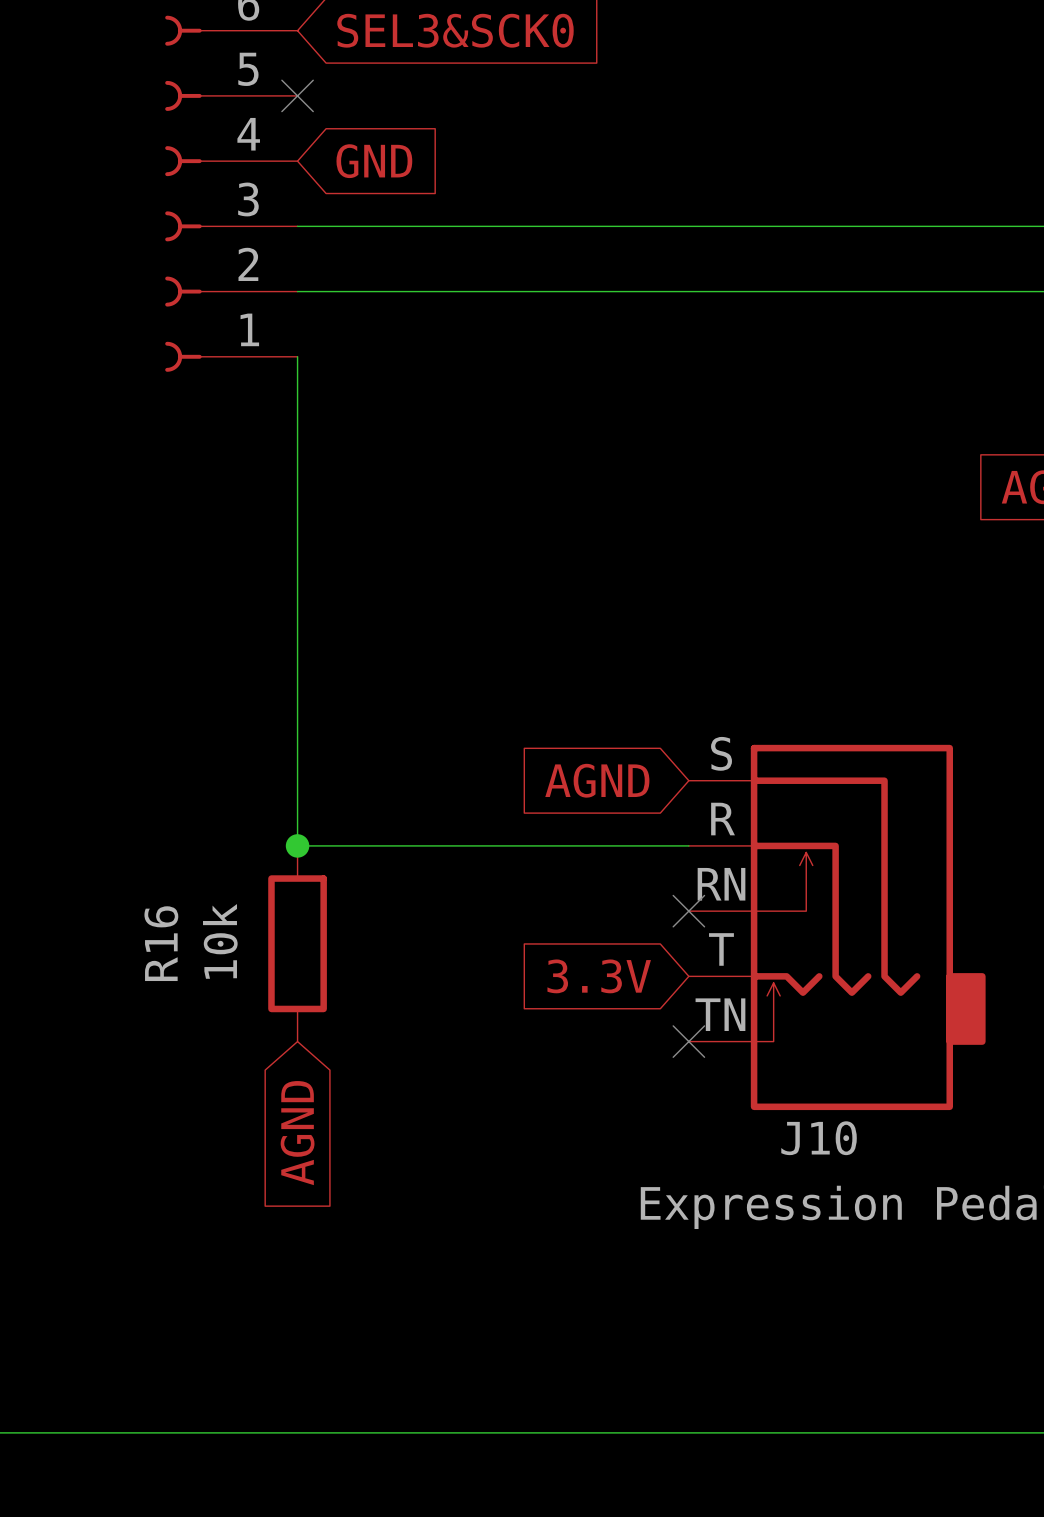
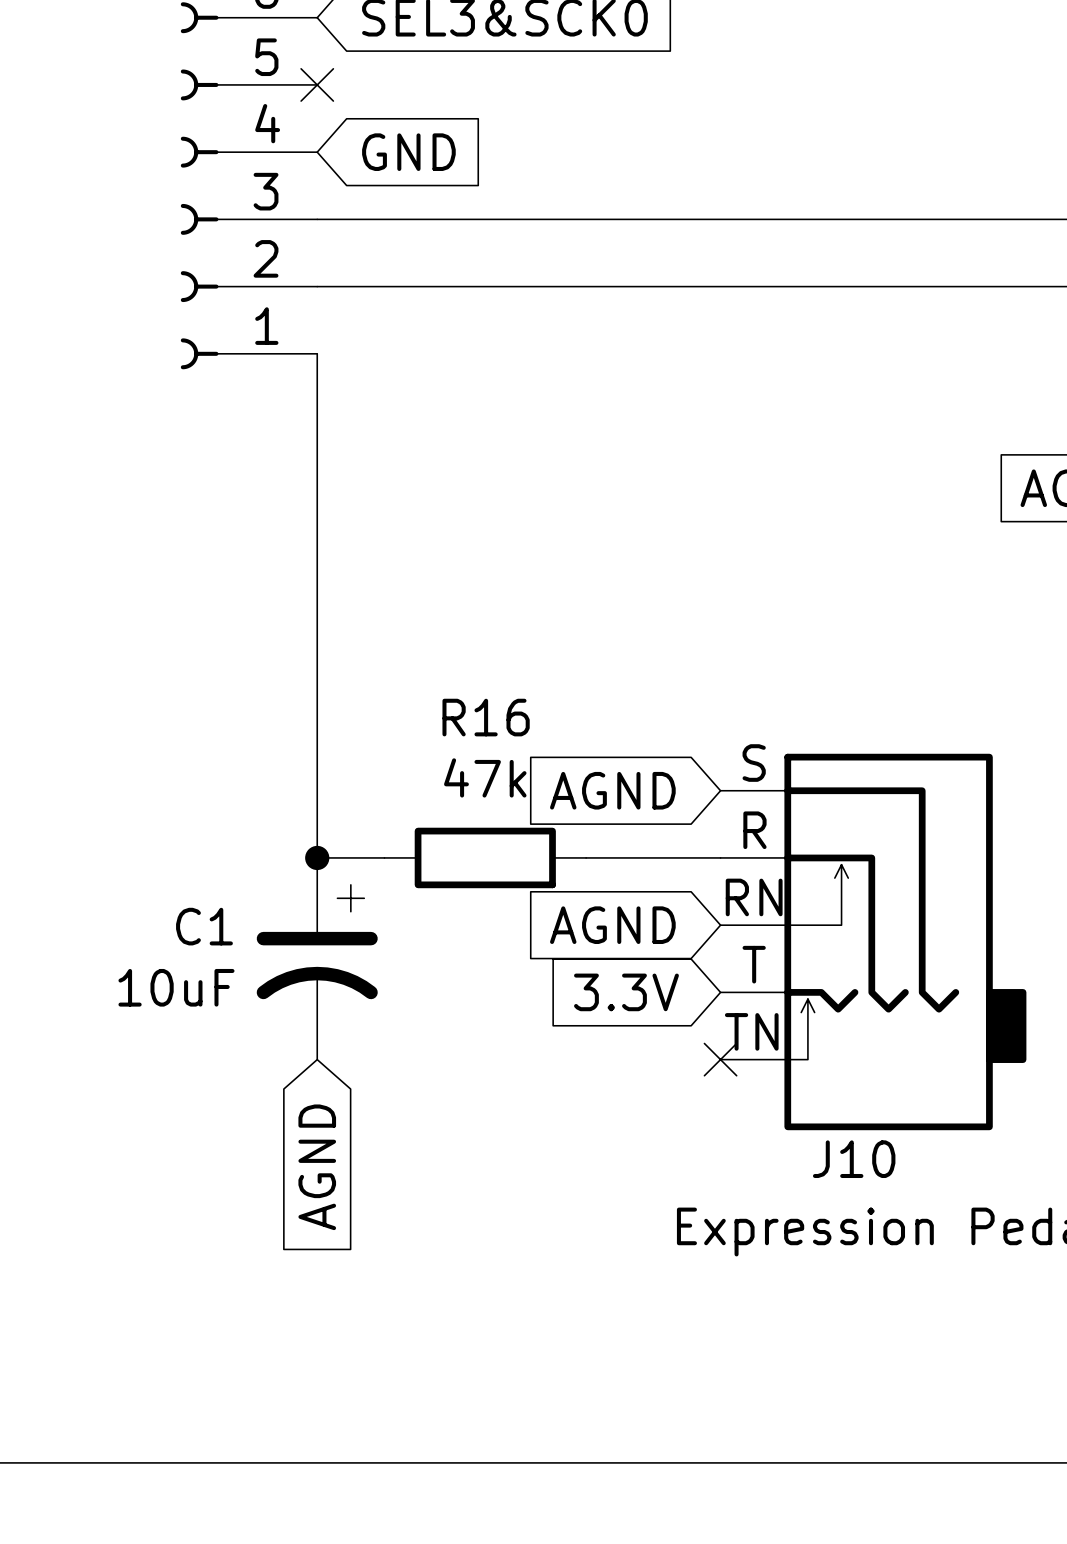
wire: (362, 845) (558, 845) -> none
global label: none -> AGND (612, 925)
no-connect mark: (688, 911) -> none
R16 value: 10k (220, 941) -> 47k (485, 777)
R16 rotation: 0° (297, 943) -> 90° clockwise (485, 857)
R16 position: (297, 943) -> (485, 857)
C1: none -> 10uF (317, 958)

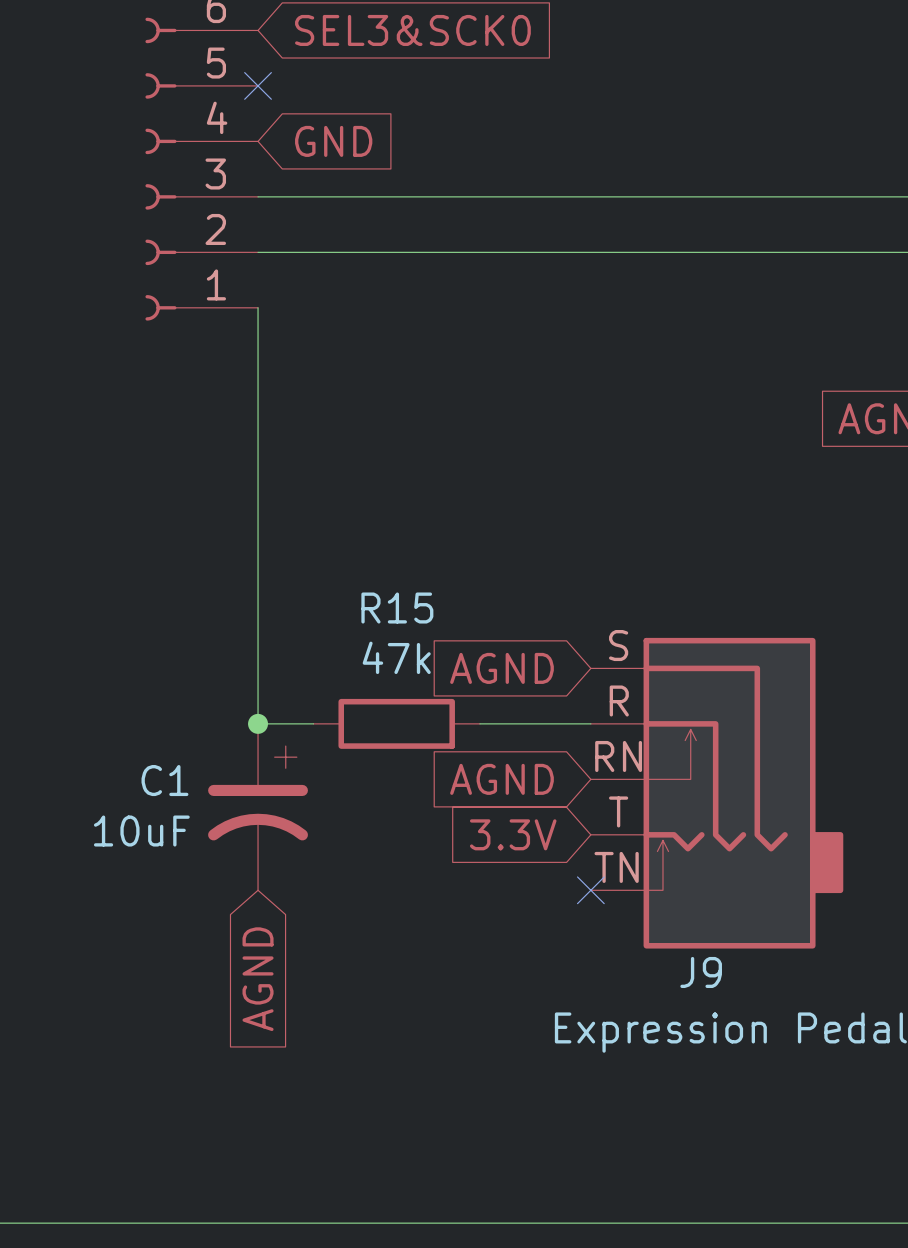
R16 name: R16 (486, 717) -> R15 (397, 608)
J10 name: J10 (854, 1159) -> J9 (701, 972)

